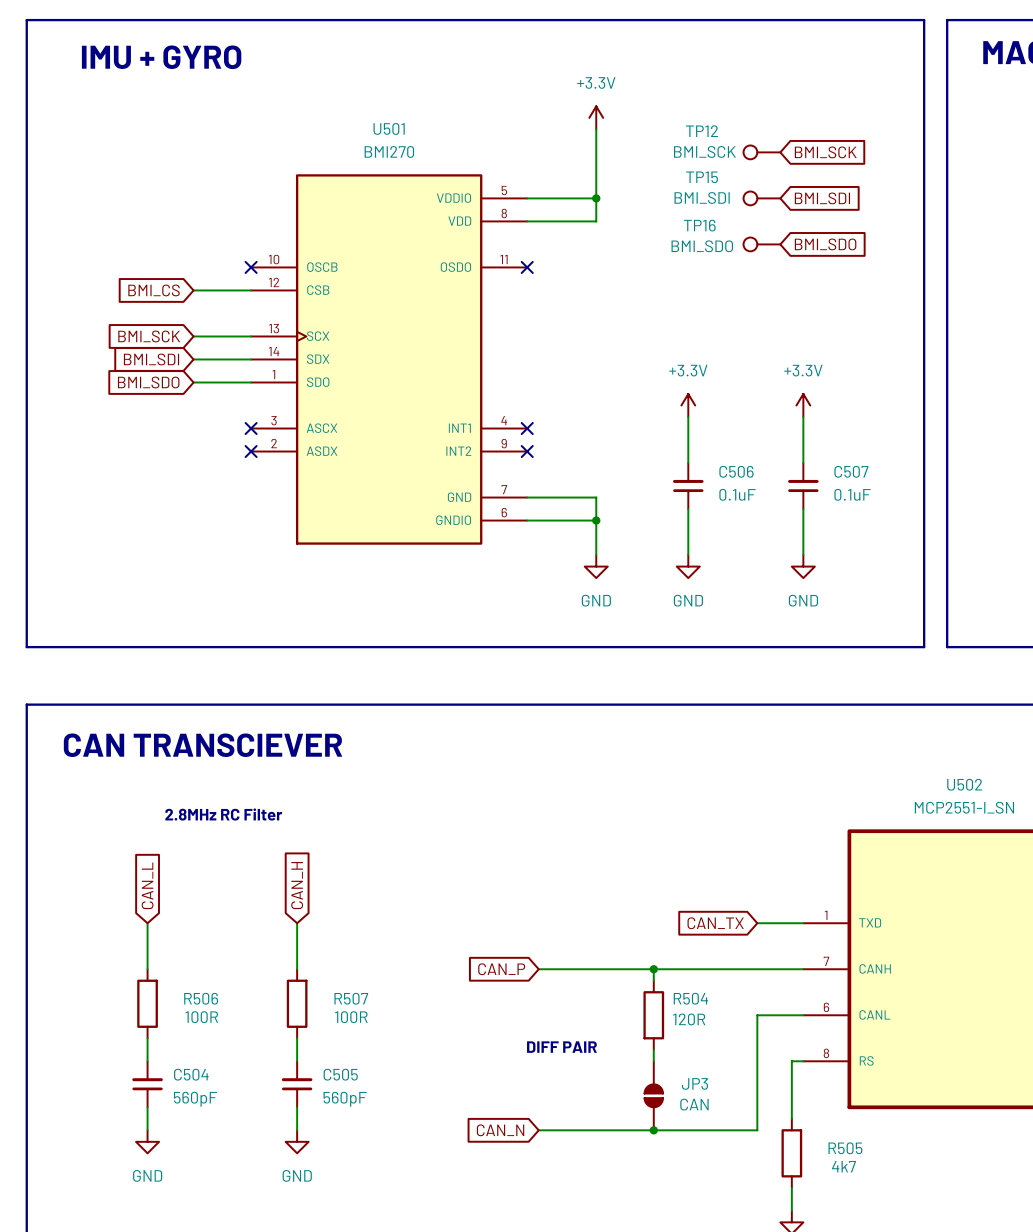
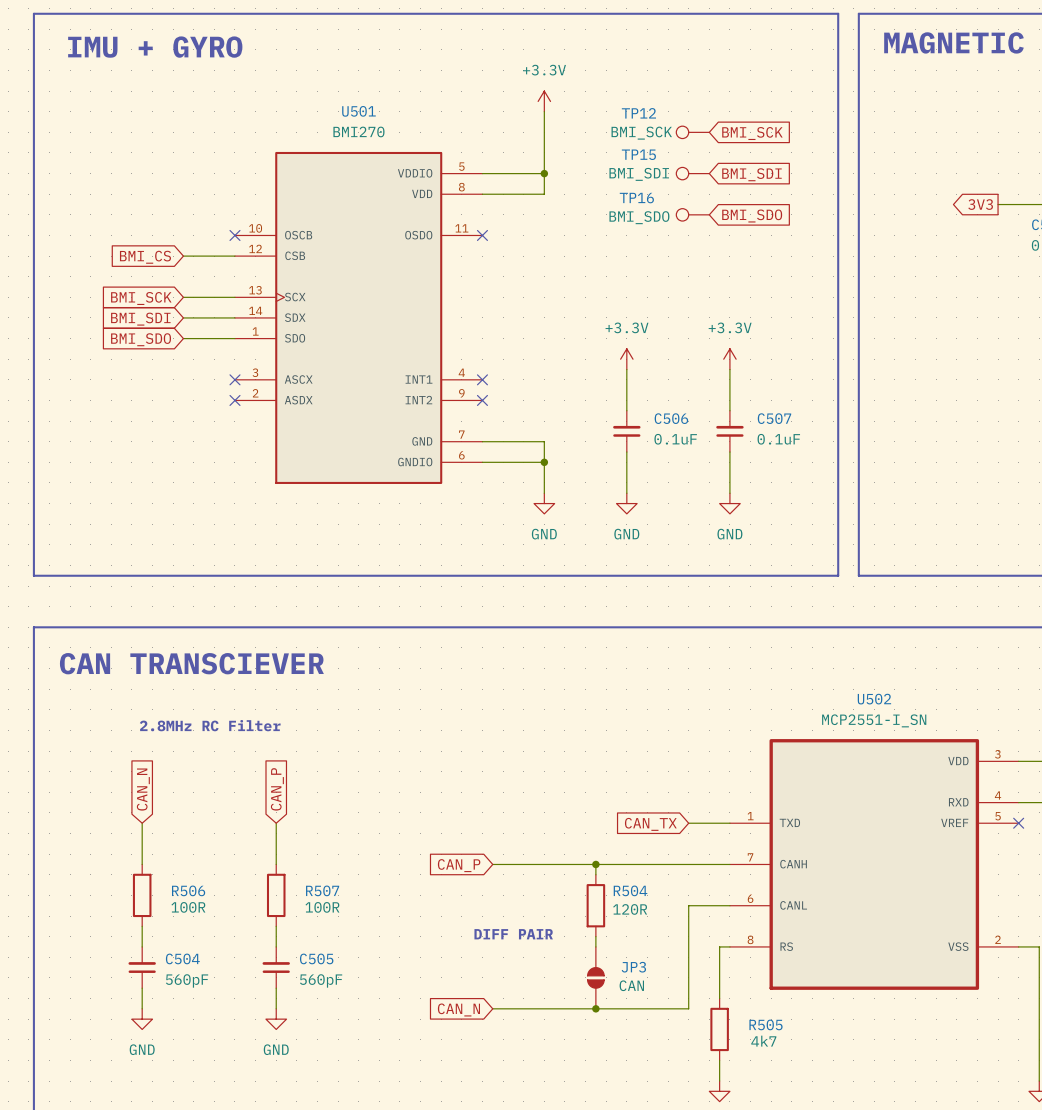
global label: CAN_L (147, 885) -> CAN_N (143, 789)
global label: CAN_H (297, 885) -> CAN_P (277, 789)

